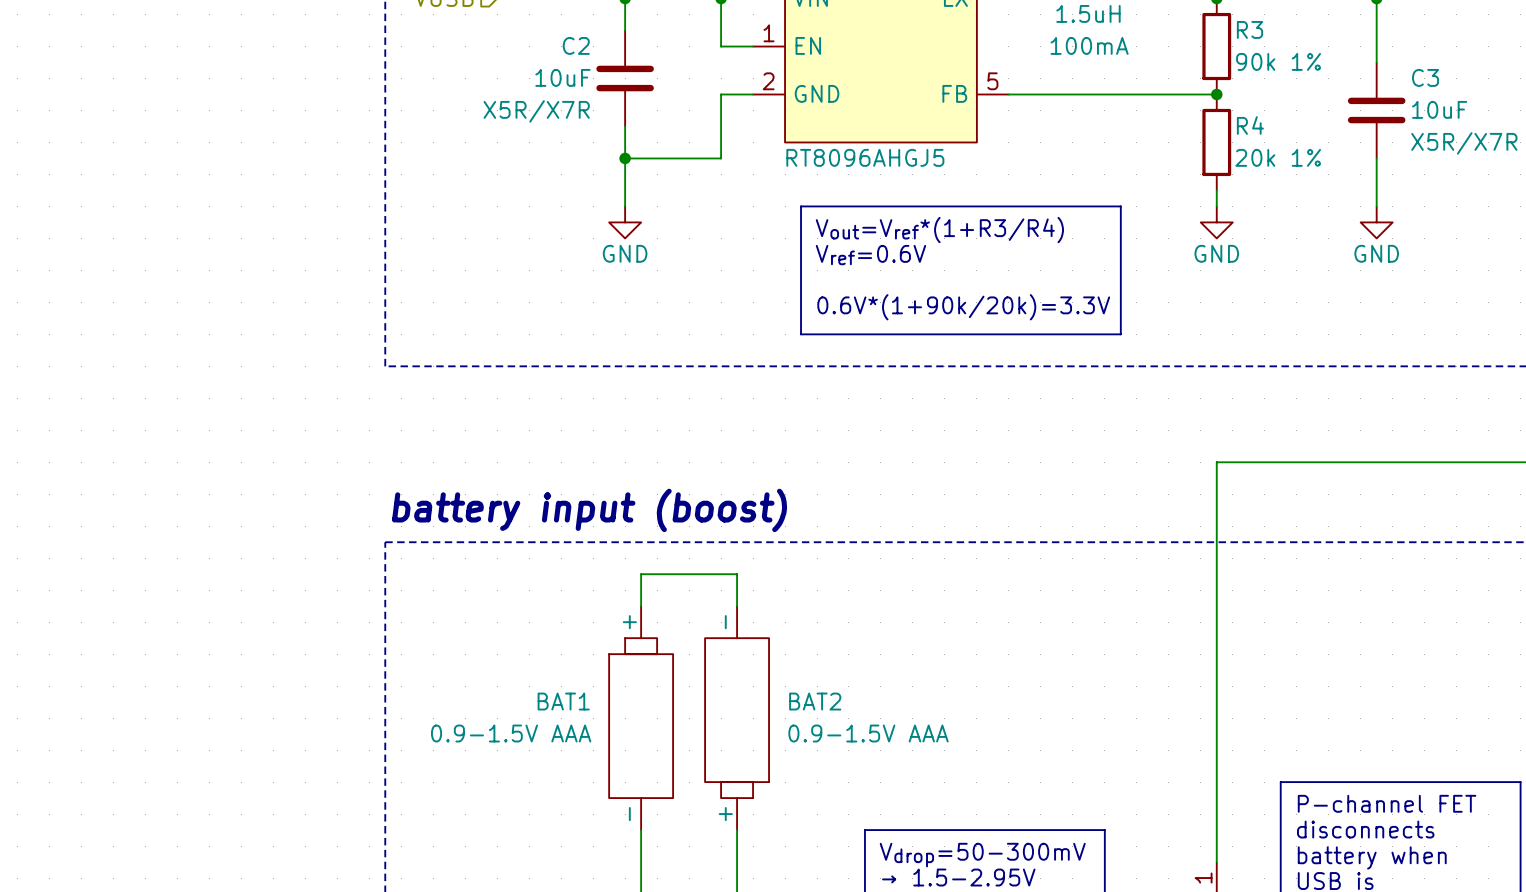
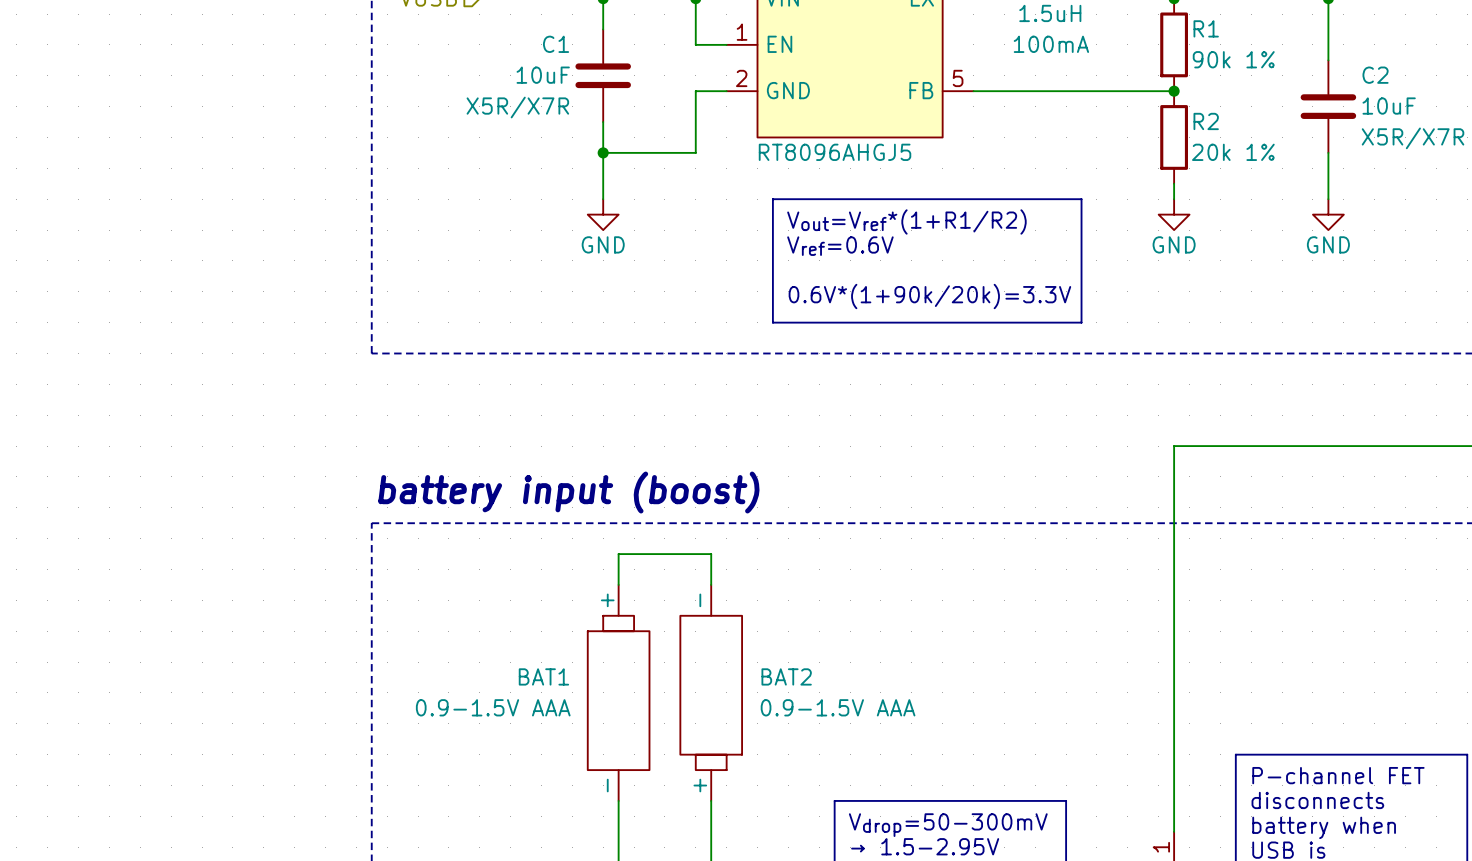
R3 name: R3 (1250, 29) -> R1 (1206, 28)
C2 name: C2 (576, 45) -> C1 (556, 44)
C3 name: C3 (1425, 77) -> C2 (1375, 75)
R4 name: R4 (1250, 125) -> R2 (1206, 121)
text: Vout=Vref*(1+R3/R4) (939, 230) -> Vout=Vref*(1+R1/R2) (906, 221)

